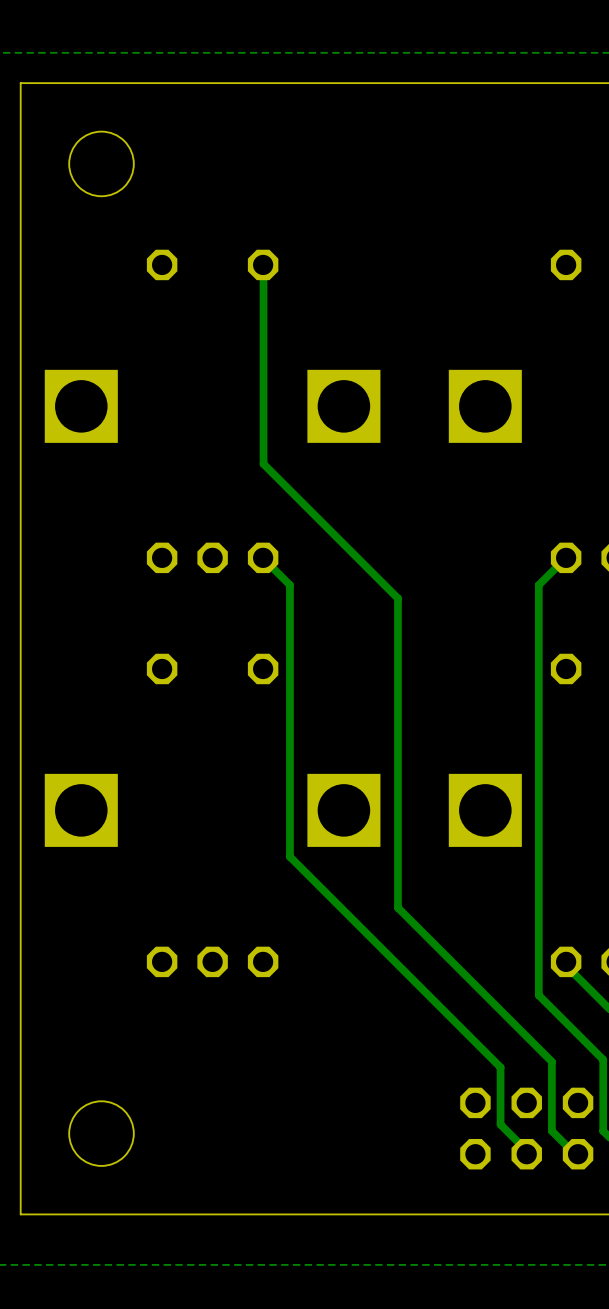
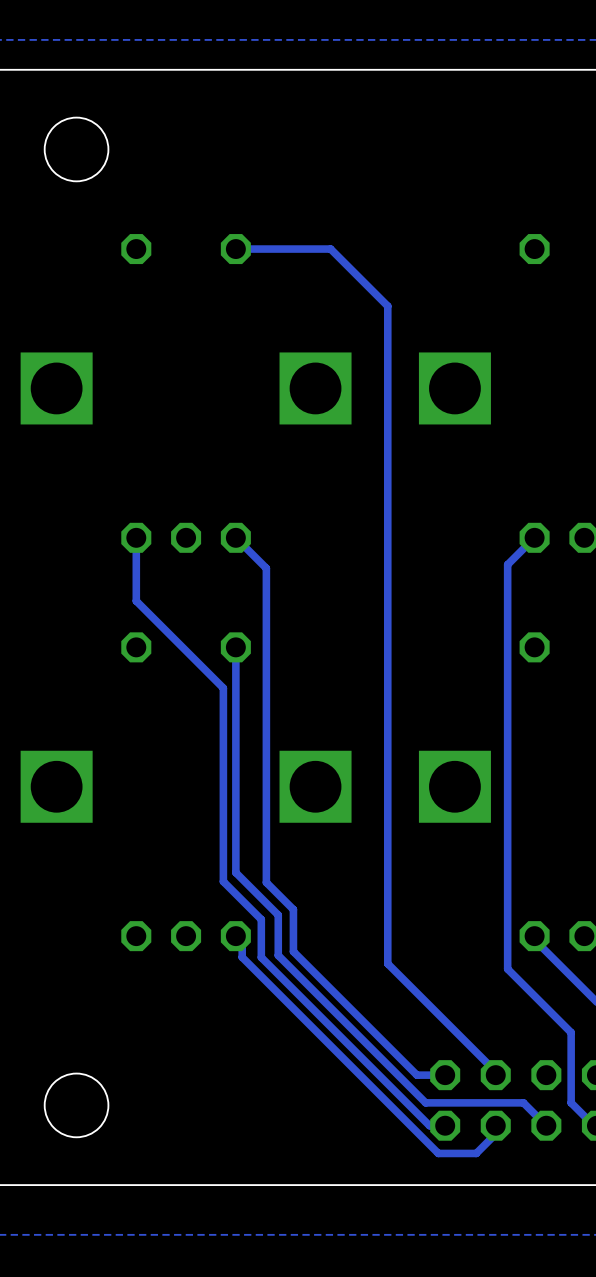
track: (263, 264) (263, 463) (397, 598) (397, 907) (551, 1061) (551, 1131) (575, 1154) (578, 1154) -> (235, 249) (330, 249) (387, 306) (387, 963) (495, 1071) (495, 1075)
track: none -> (136, 537) (136, 601) (223, 688) (223, 881) (261, 919) (261, 957) (429, 1125) (445, 1125)
track: (263, 557) (289, 585) (289, 856) (500, 1067) (500, 1124) (525, 1149) (526, 1154) -> (235, 537) (266, 568) (266, 882) (293, 909) (293, 951) (416, 1075) (445, 1075)
track: none -> (235, 647) (235, 872) (278, 915) (278, 955) (425, 1102) (523, 1102) (546, 1125)
track: none -> (235, 936) (242, 942) (242, 957) (438, 1153) (476, 1153) (495, 1133) (495, 1125)

